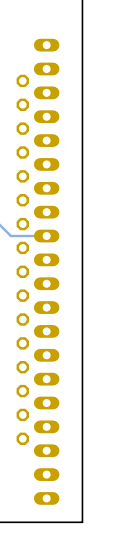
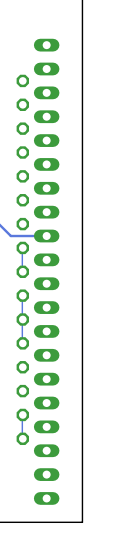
track: none -> (22, 247) (22, 271)
track: none -> (22, 295) (22, 343)
track: none -> (22, 414) (22, 438)

